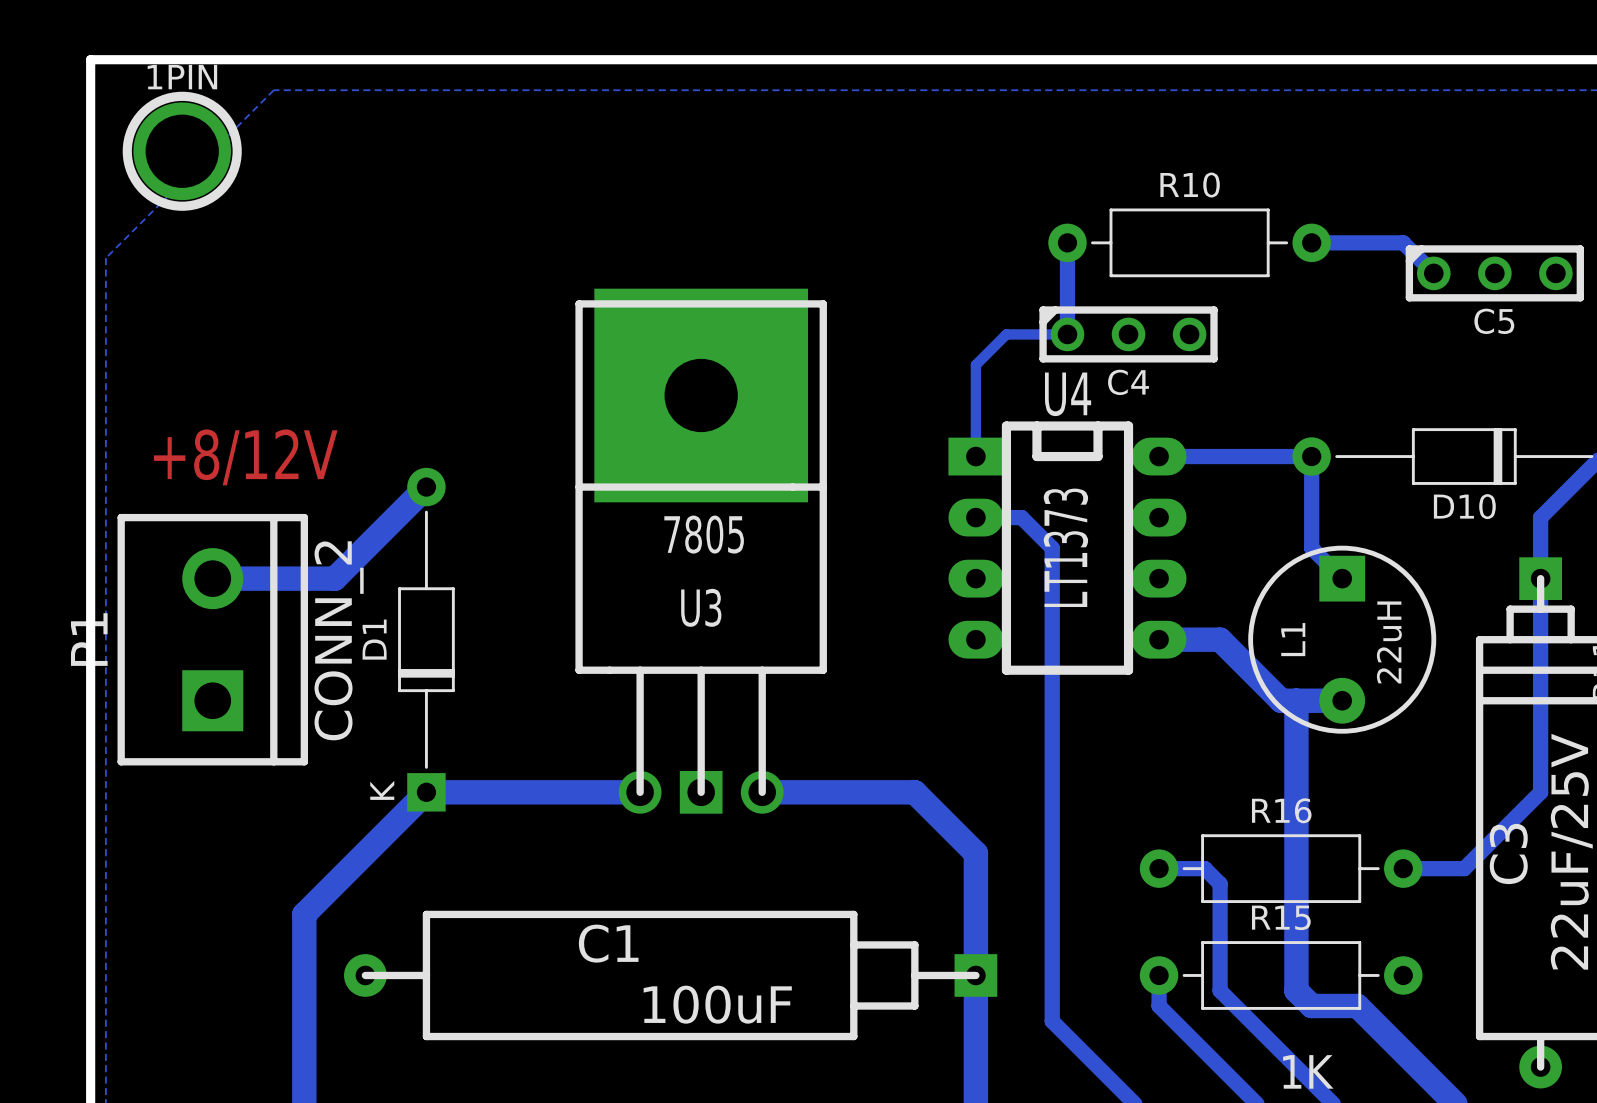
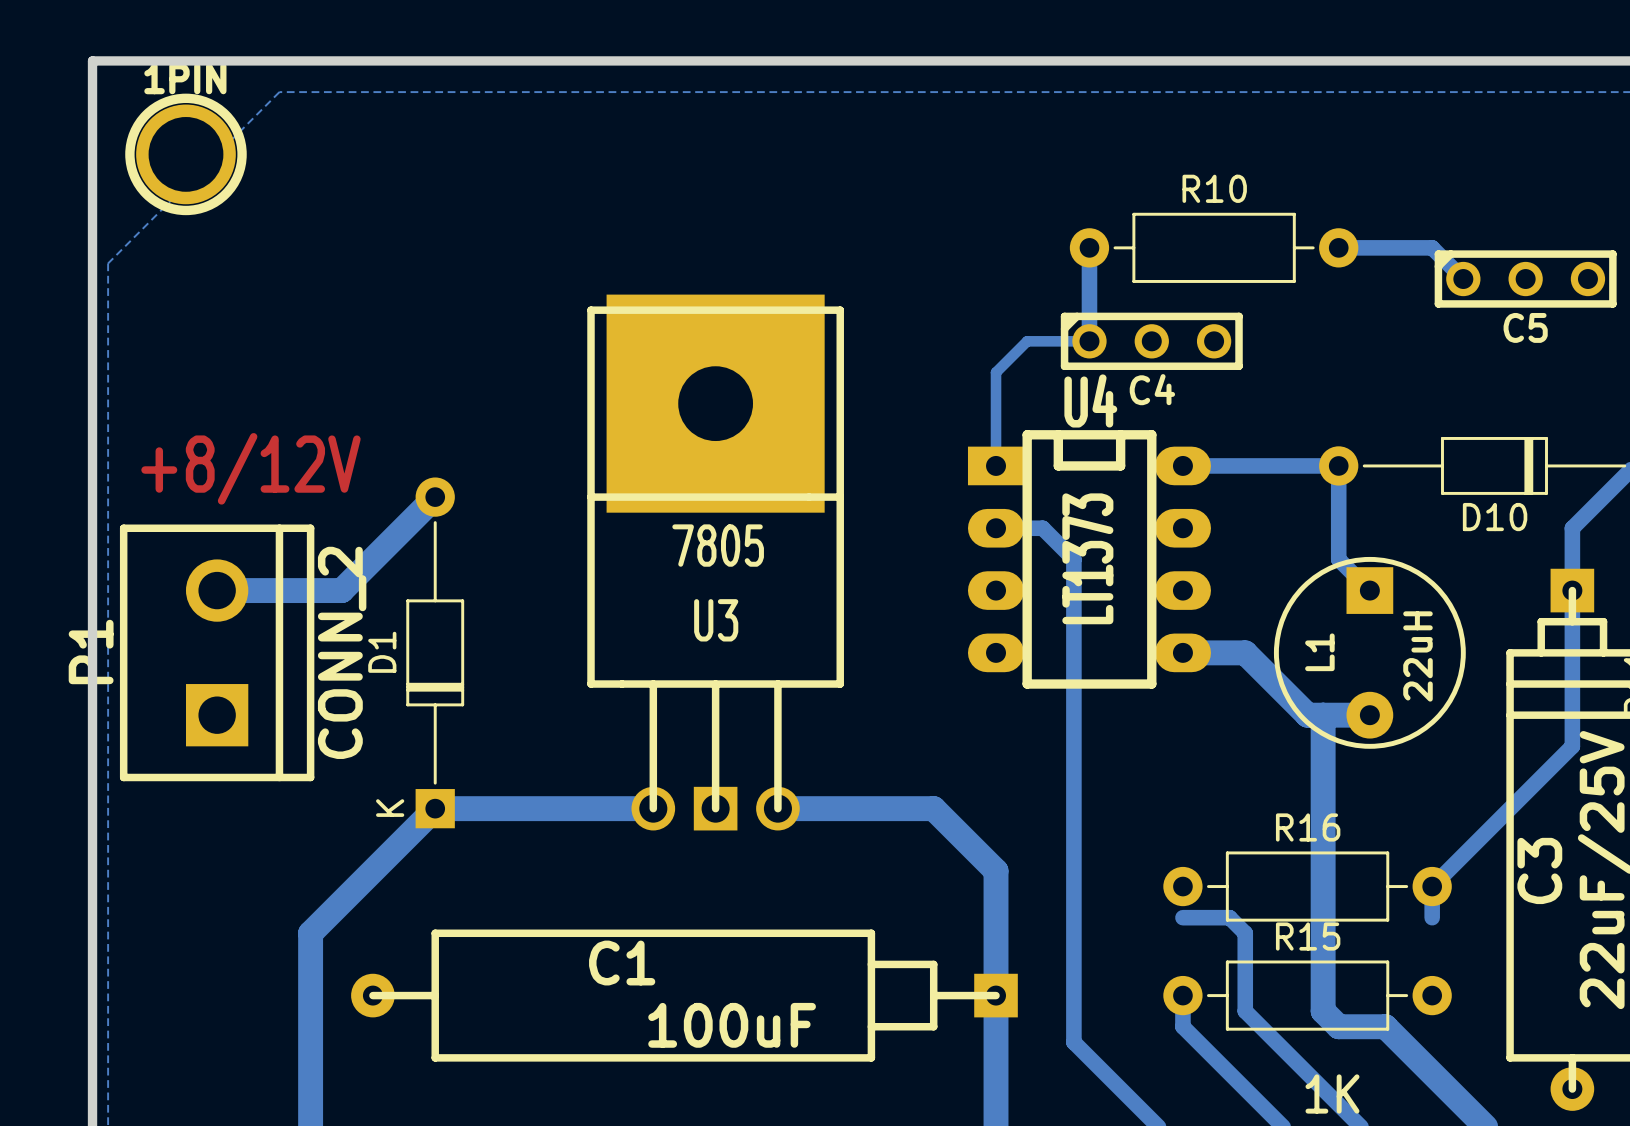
bottom track: (1540, 731) (1540, 792) (1464, 868) (1403, 868) -> (1572, 746) (1432, 886) (1432, 917)
bottom track: (1159, 868) (1204, 868) (1220, 883) (1220, 914) -> (1182, 917) (1229, 917) (1245, 933)

